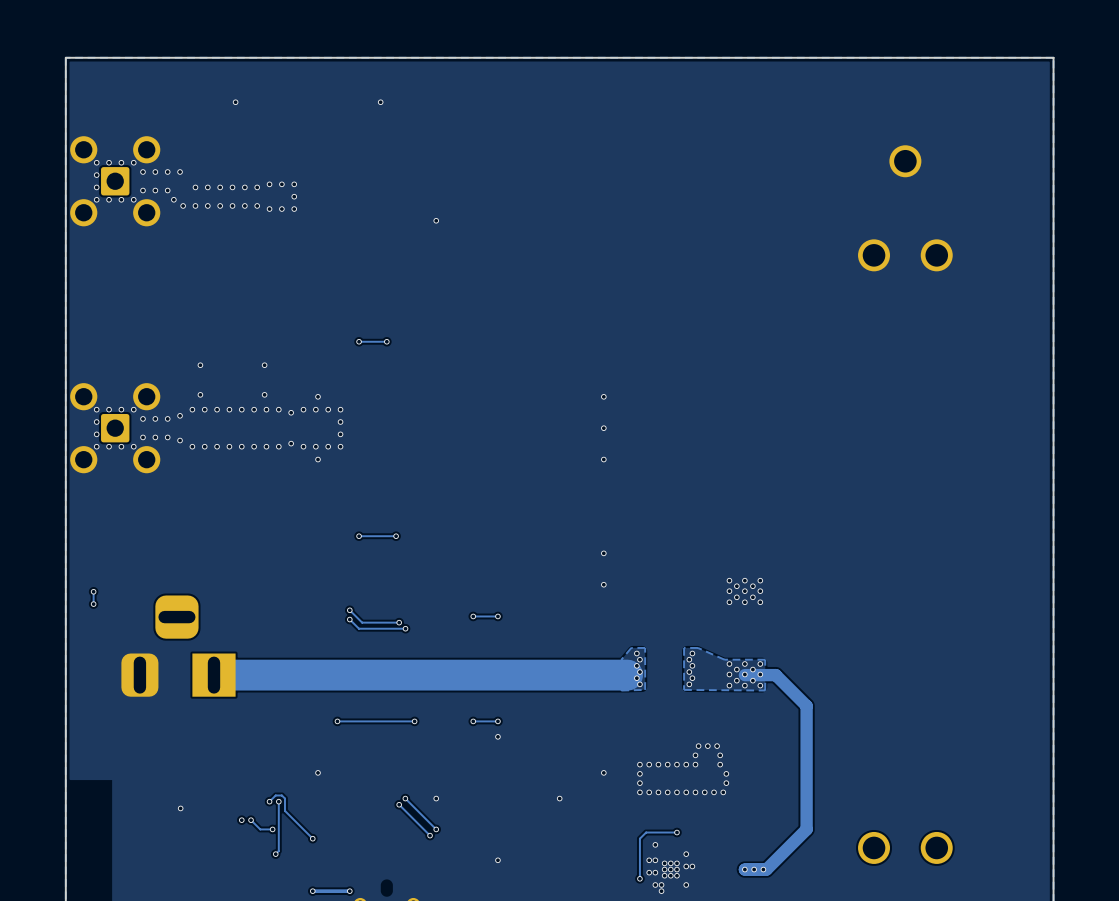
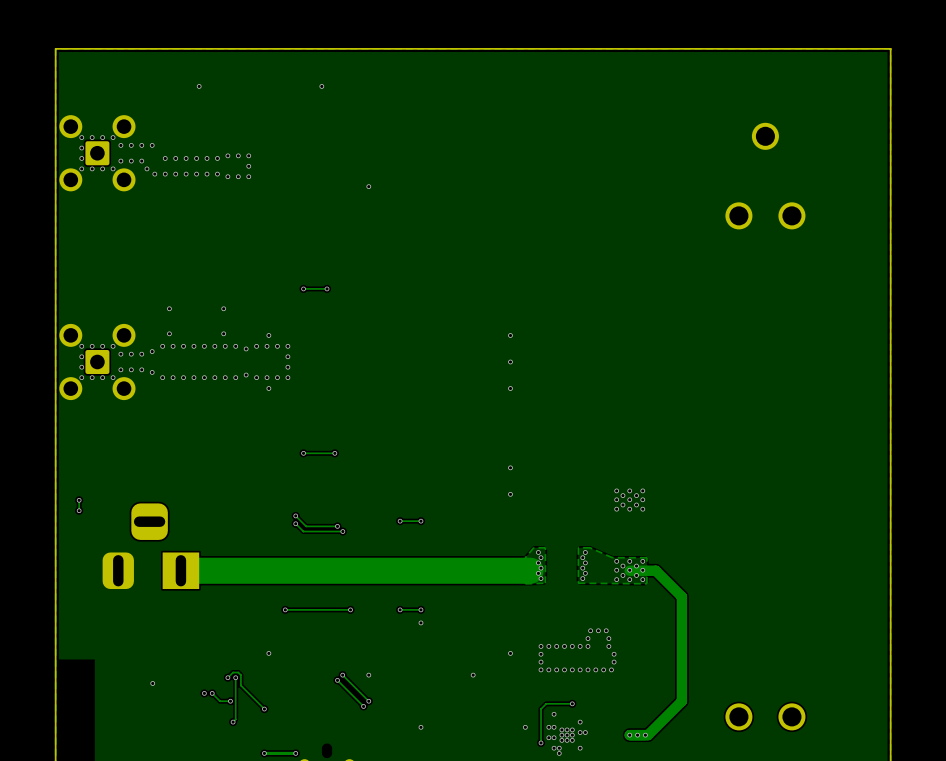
via: none -> (525, 727)

